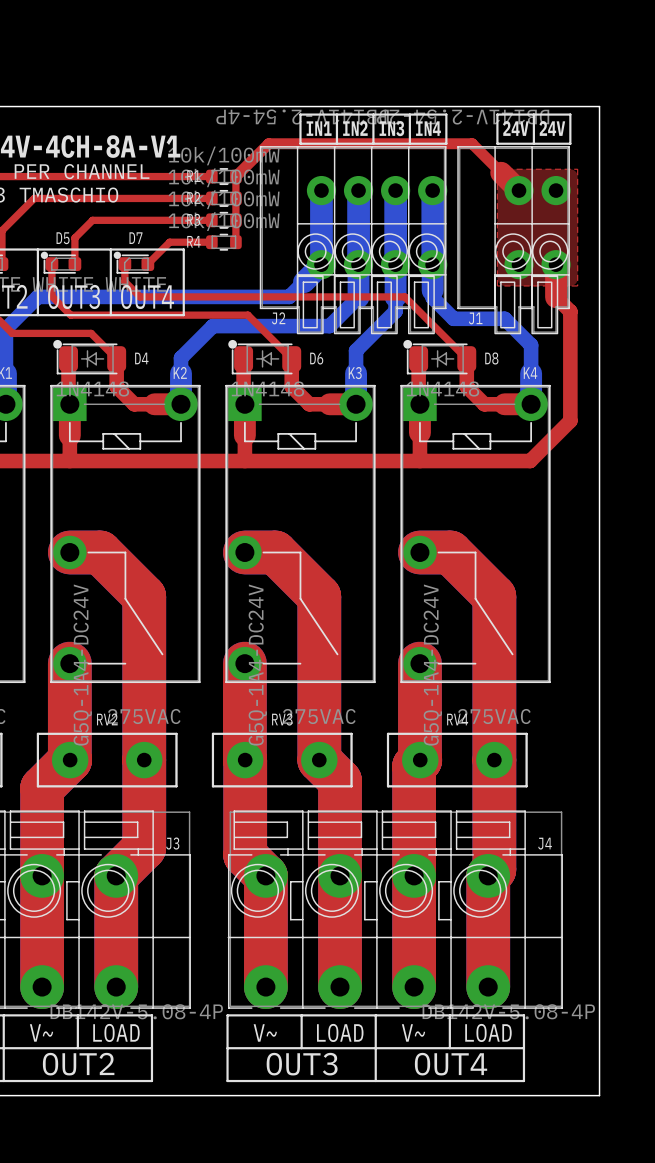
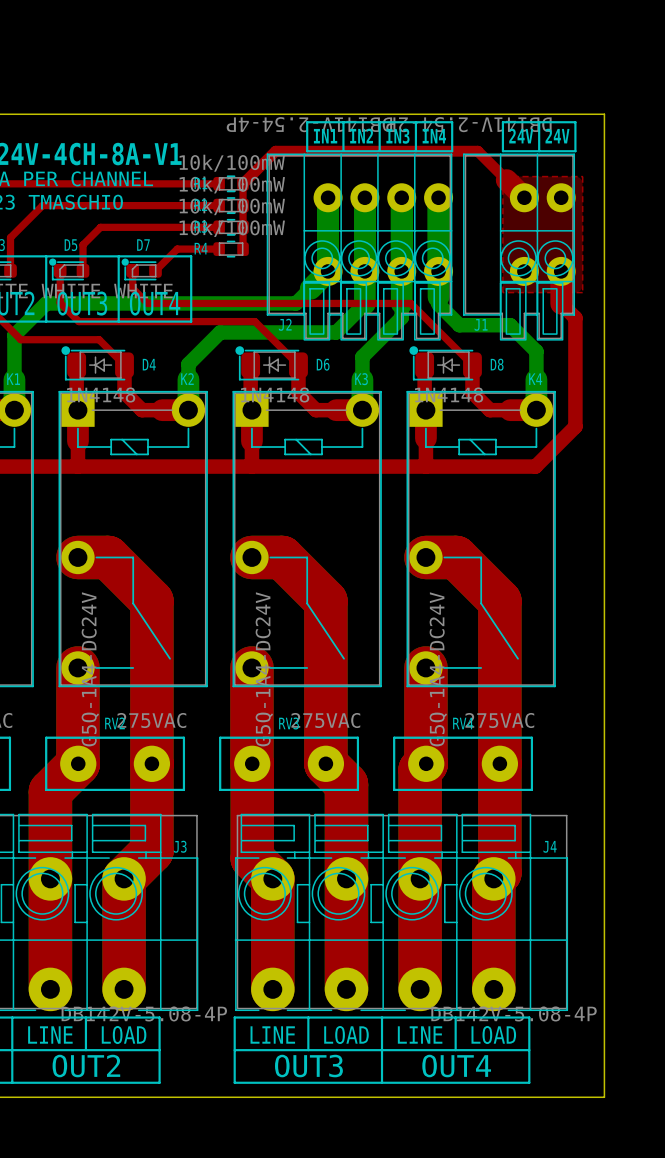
text: V~ (41, 1032) -> LINE (50, 1035)
text: V~ (265, 1032) -> LINE (272, 1035)
text: V~ (413, 1032) -> LINE (420, 1035)

